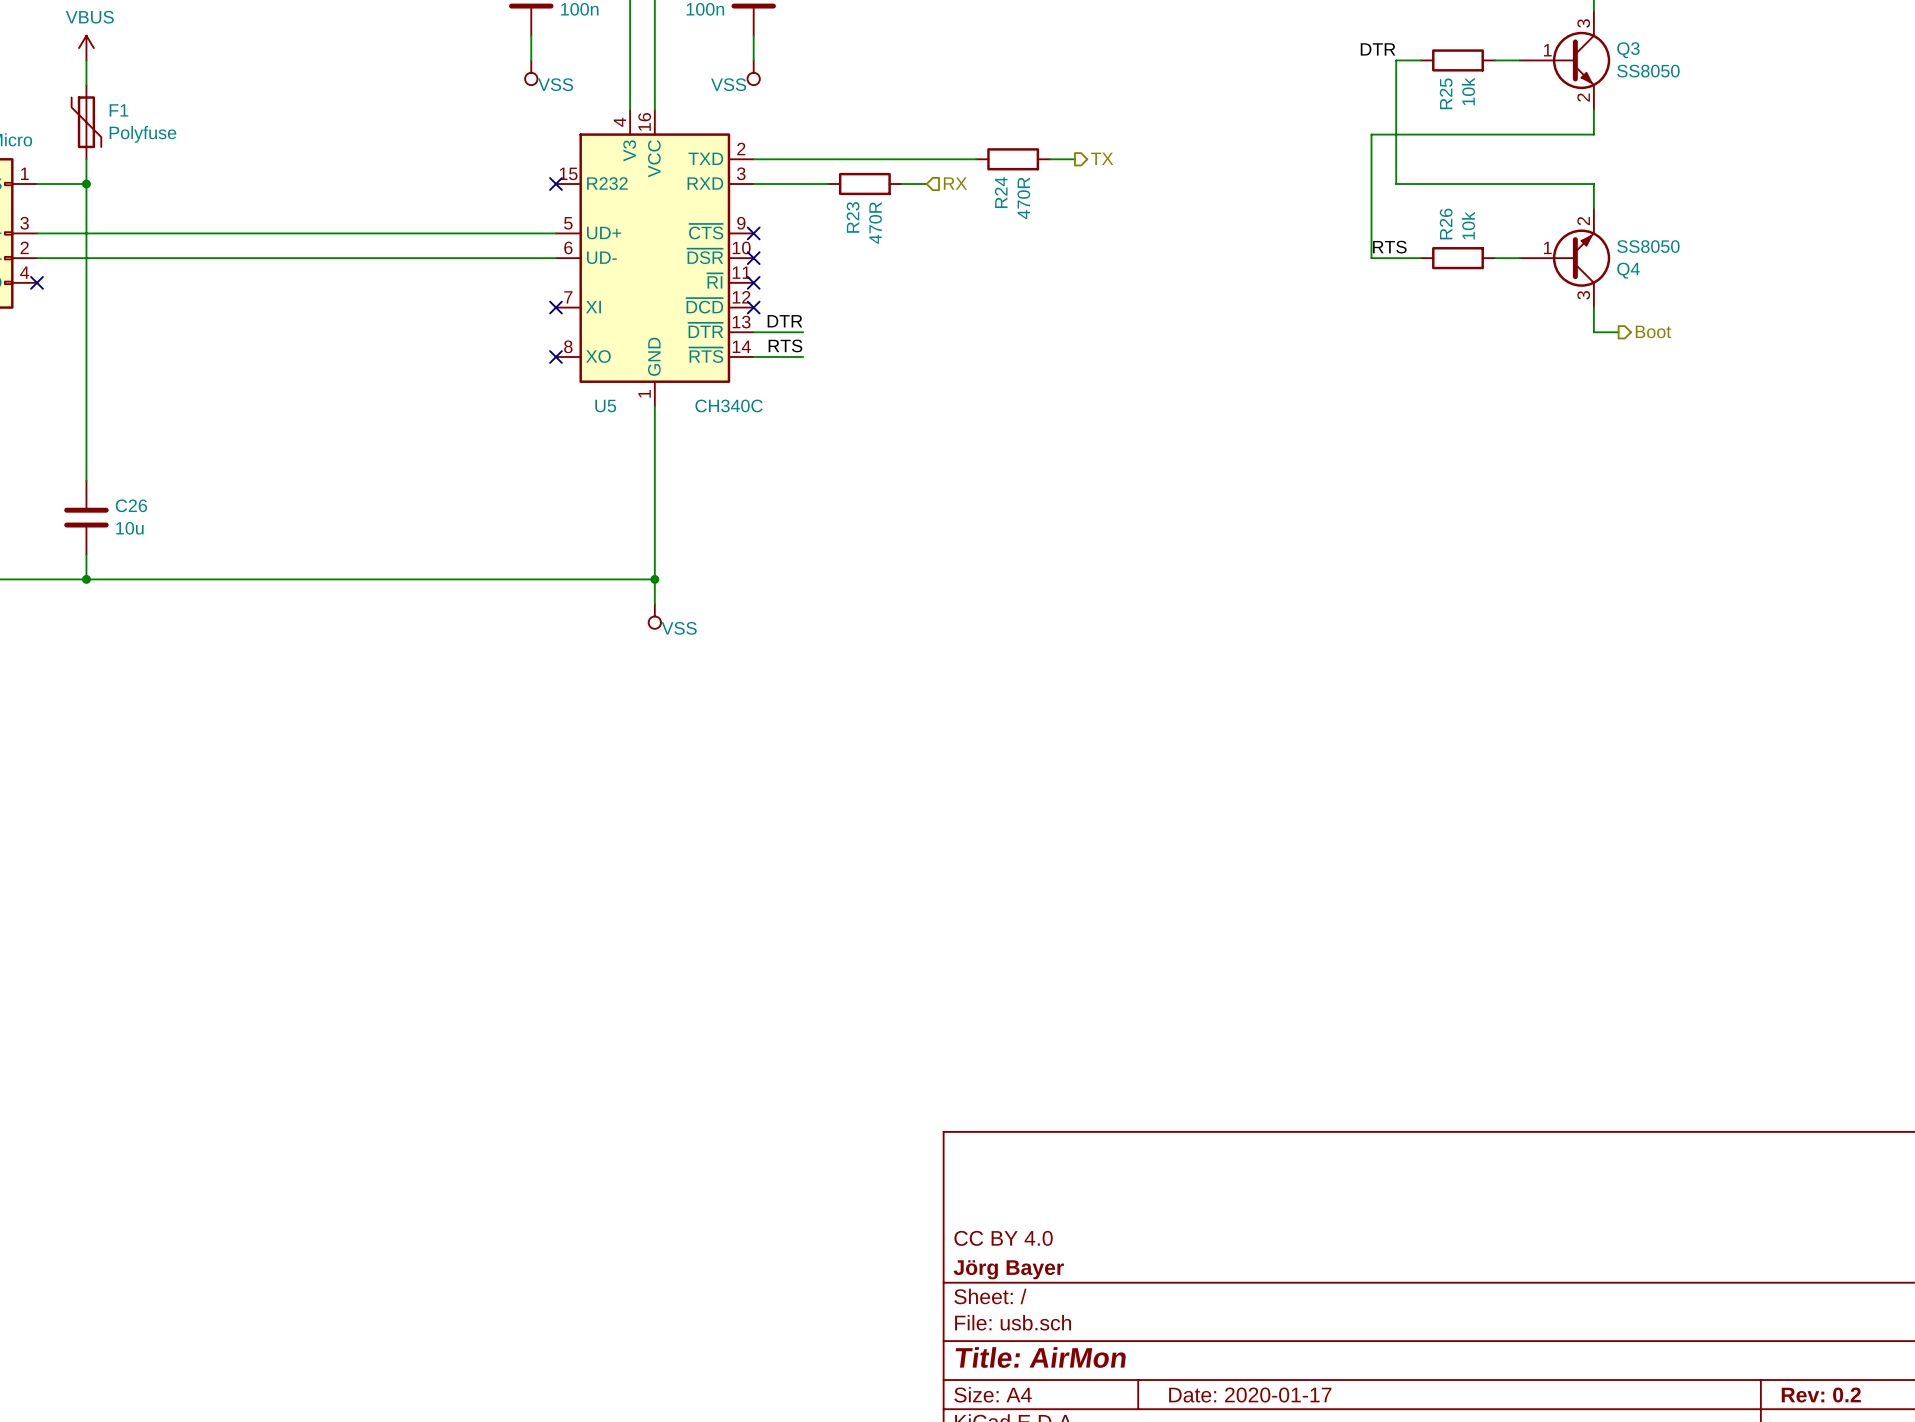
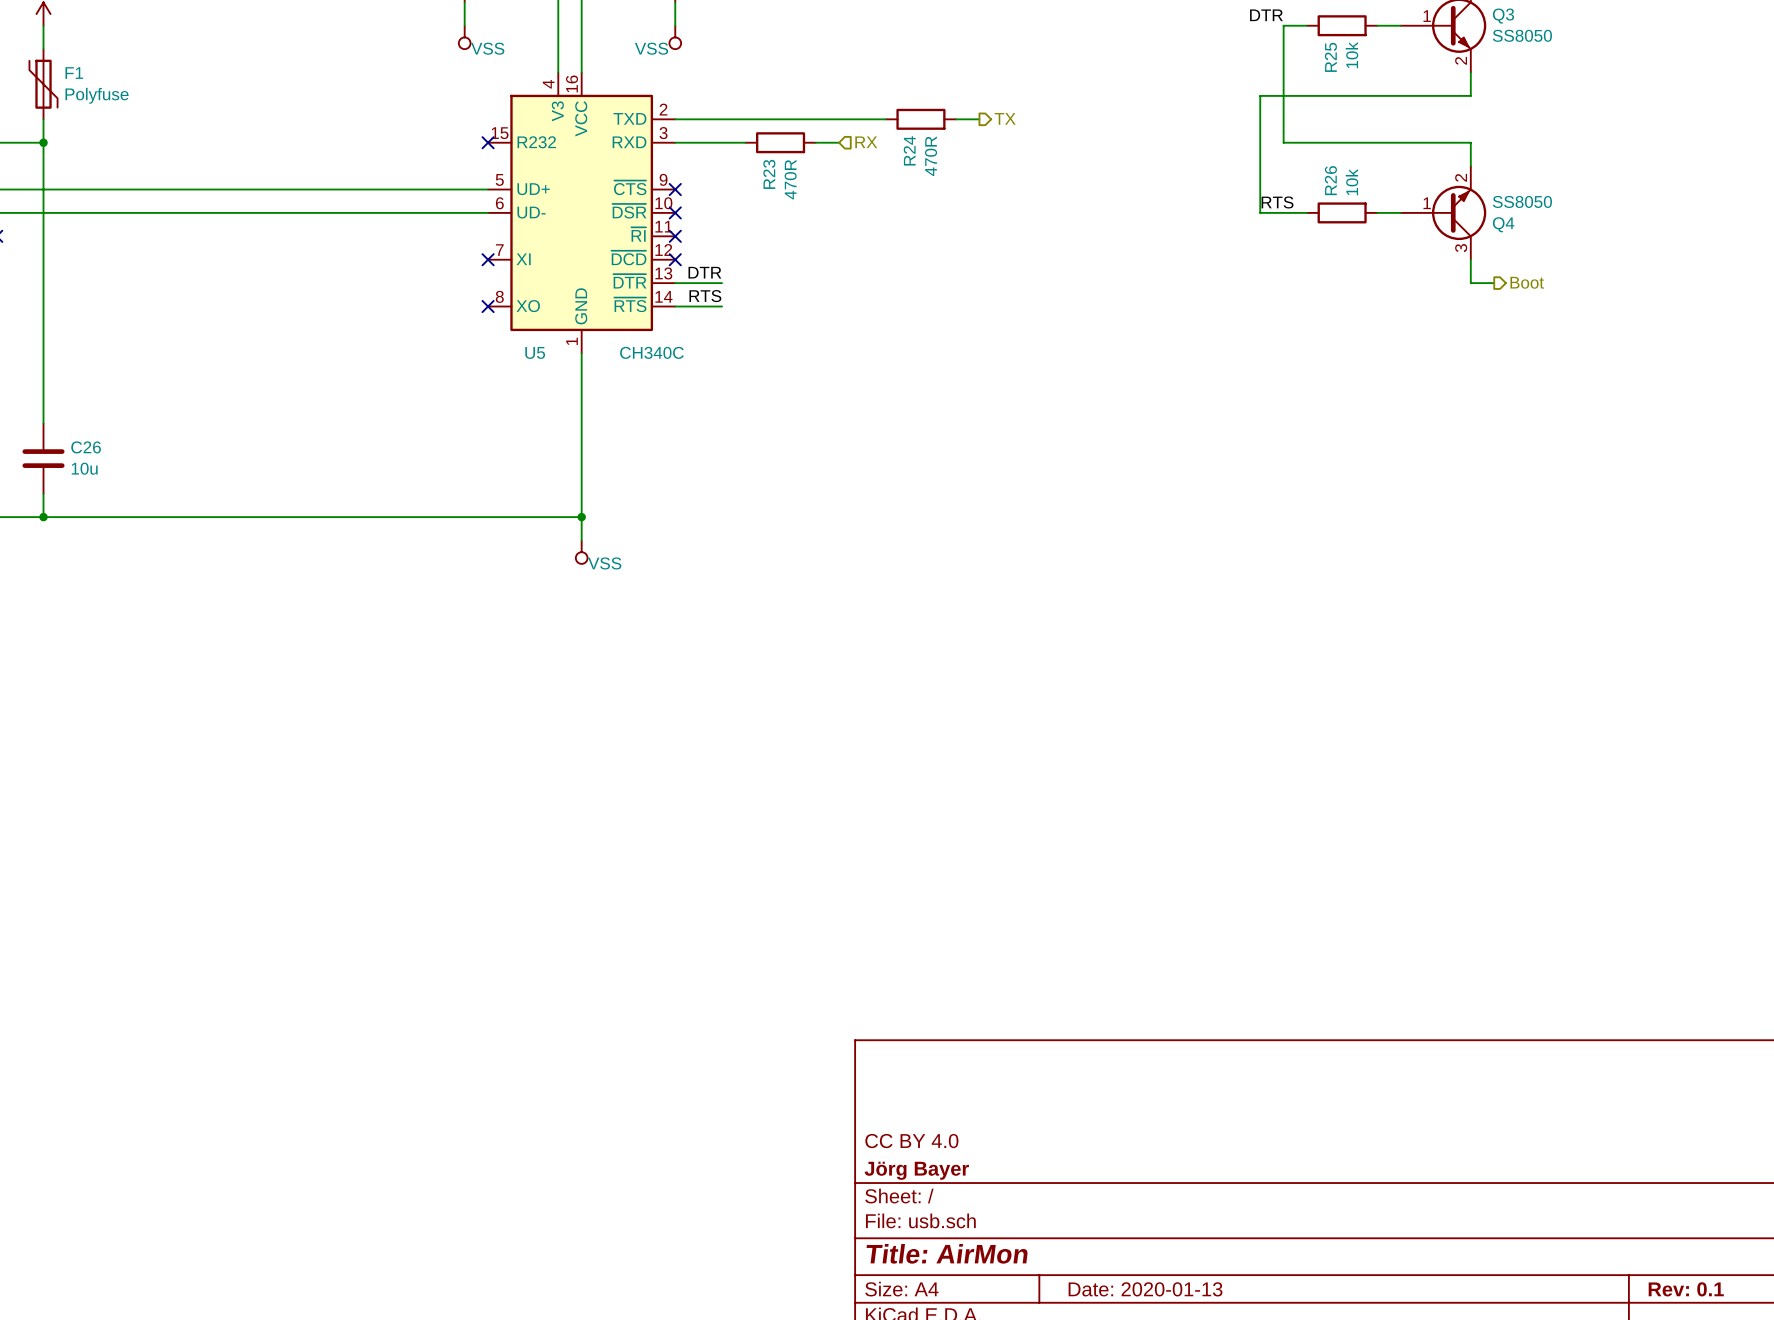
title block: Date: 2020-01-17 (1250, 1395) -> Date: 2020-01-13 (1145, 1289)
title block: Rev: 0.2 (1821, 1395) -> Rev: 0.1 (1686, 1289)

